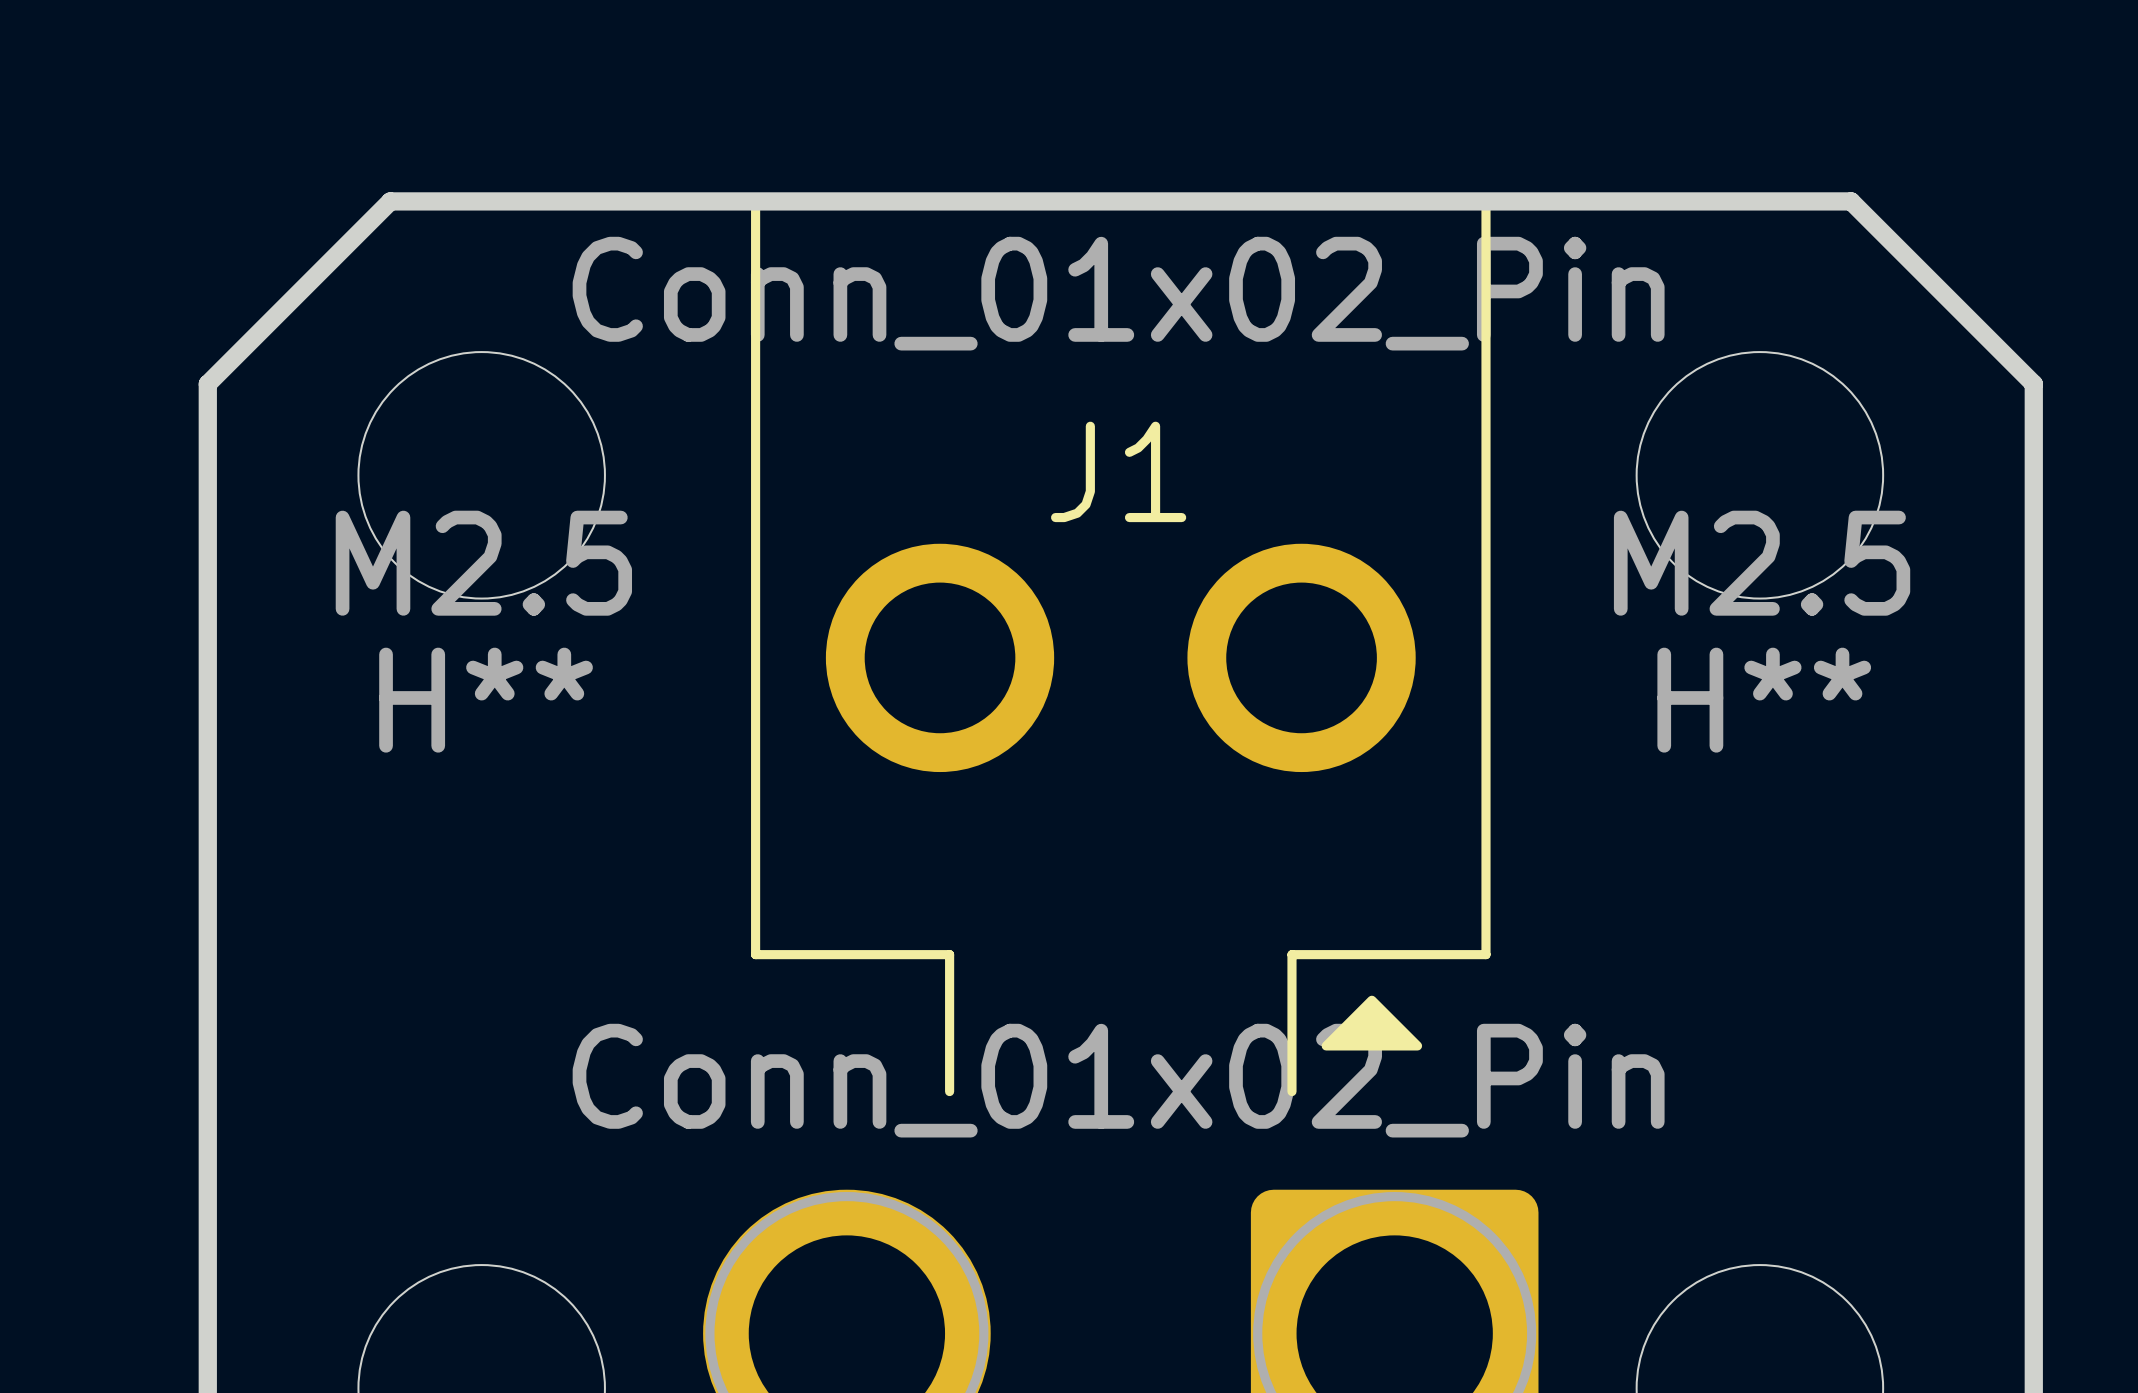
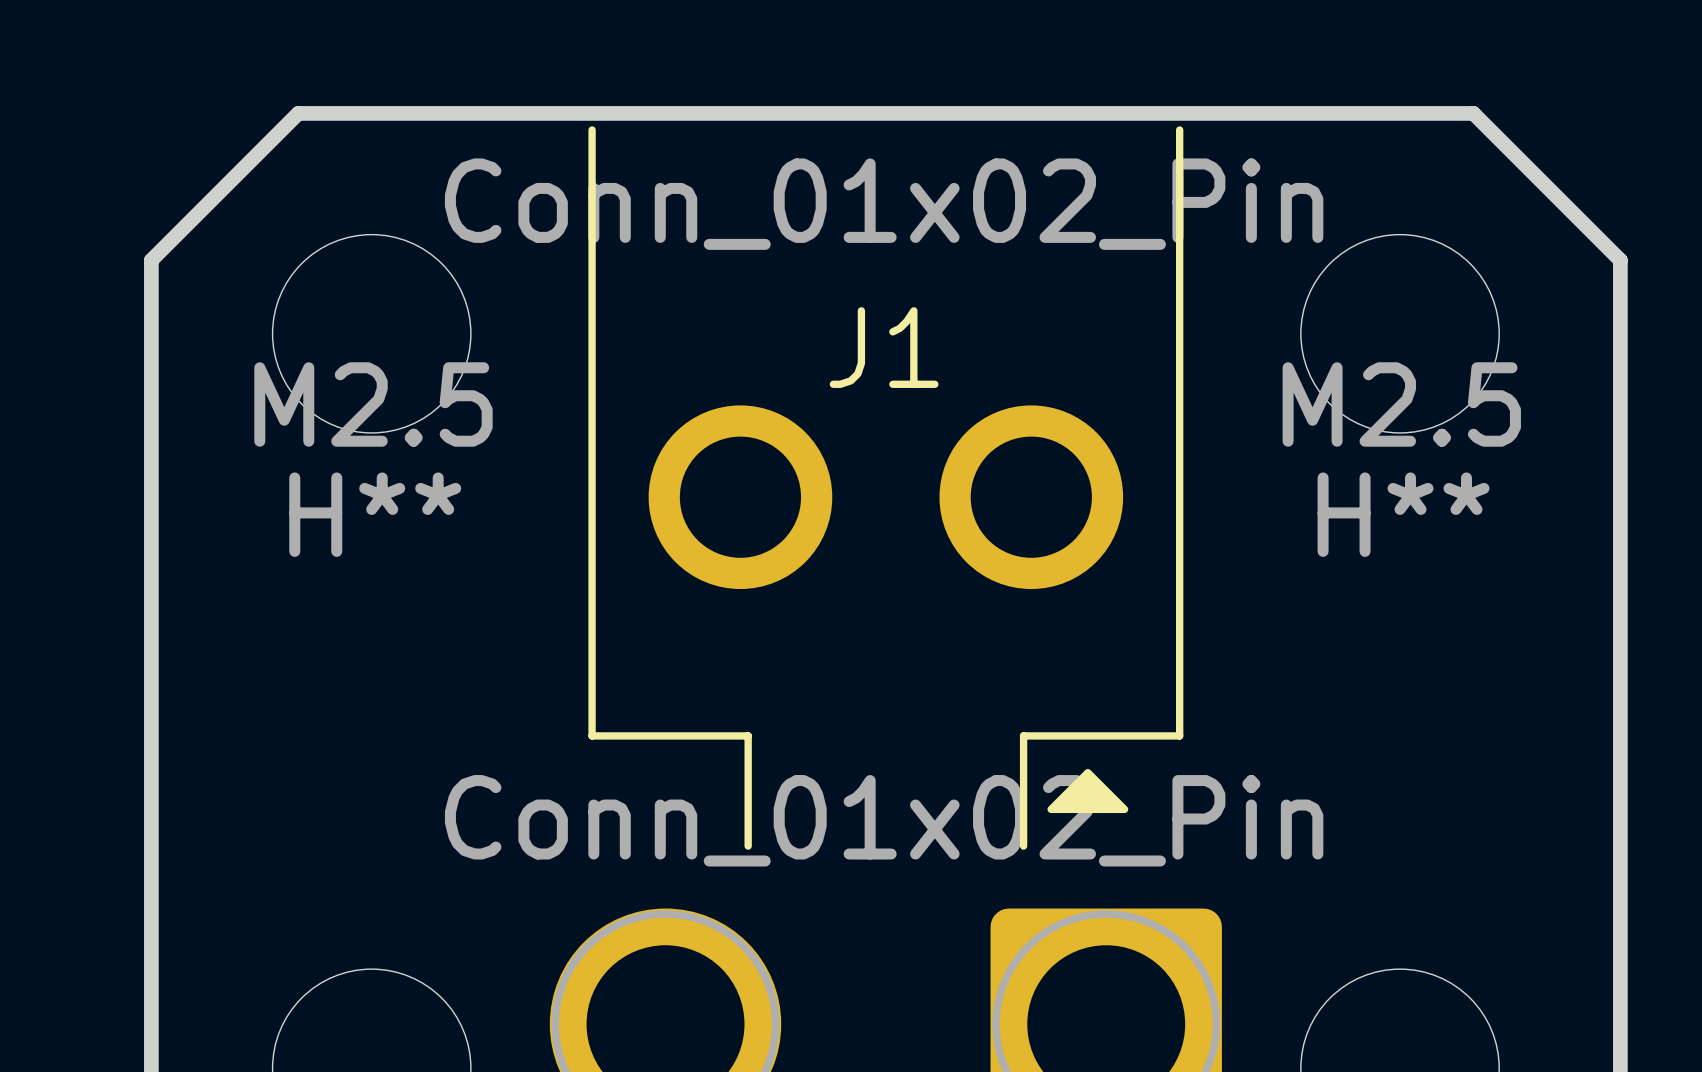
J1 position: (1120, 646) -> (885, 488)

